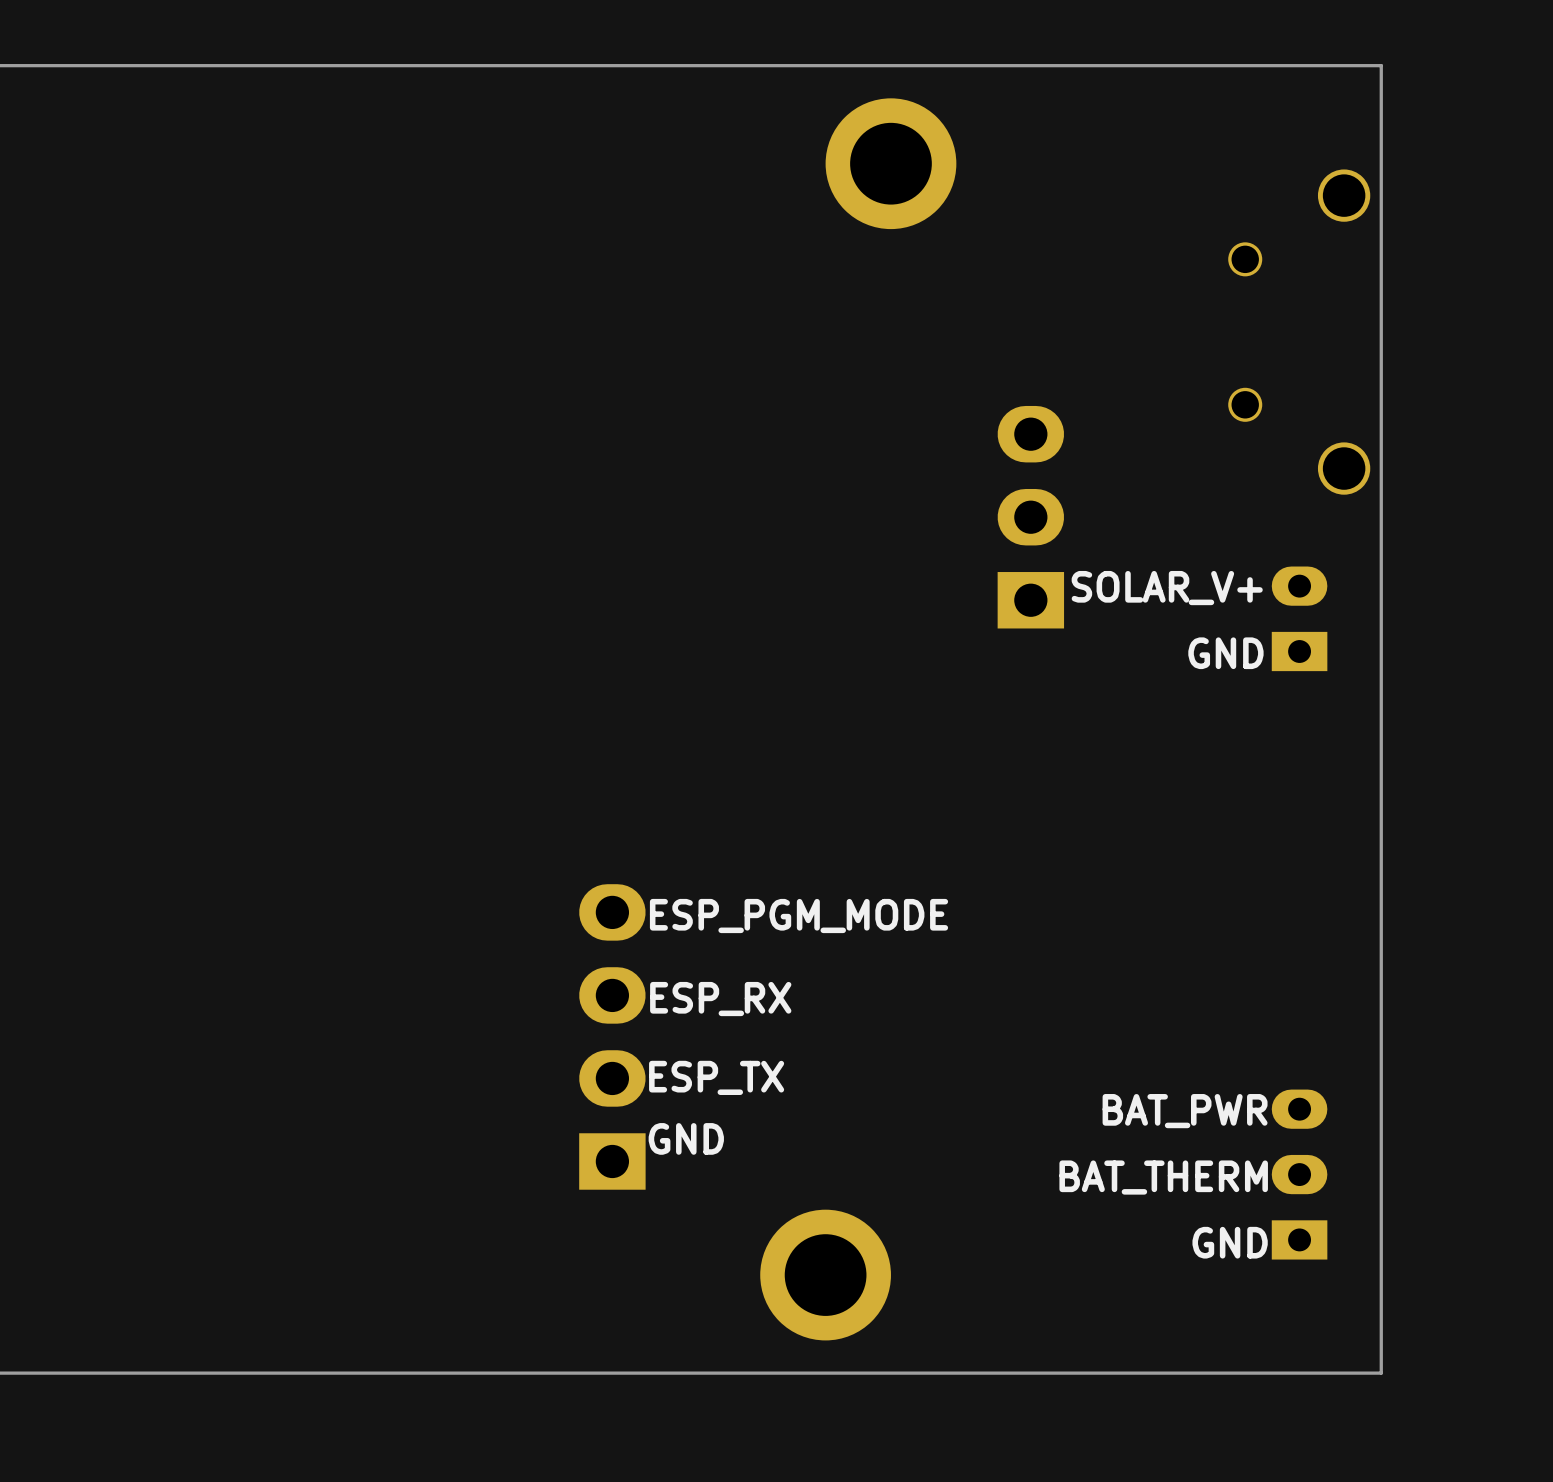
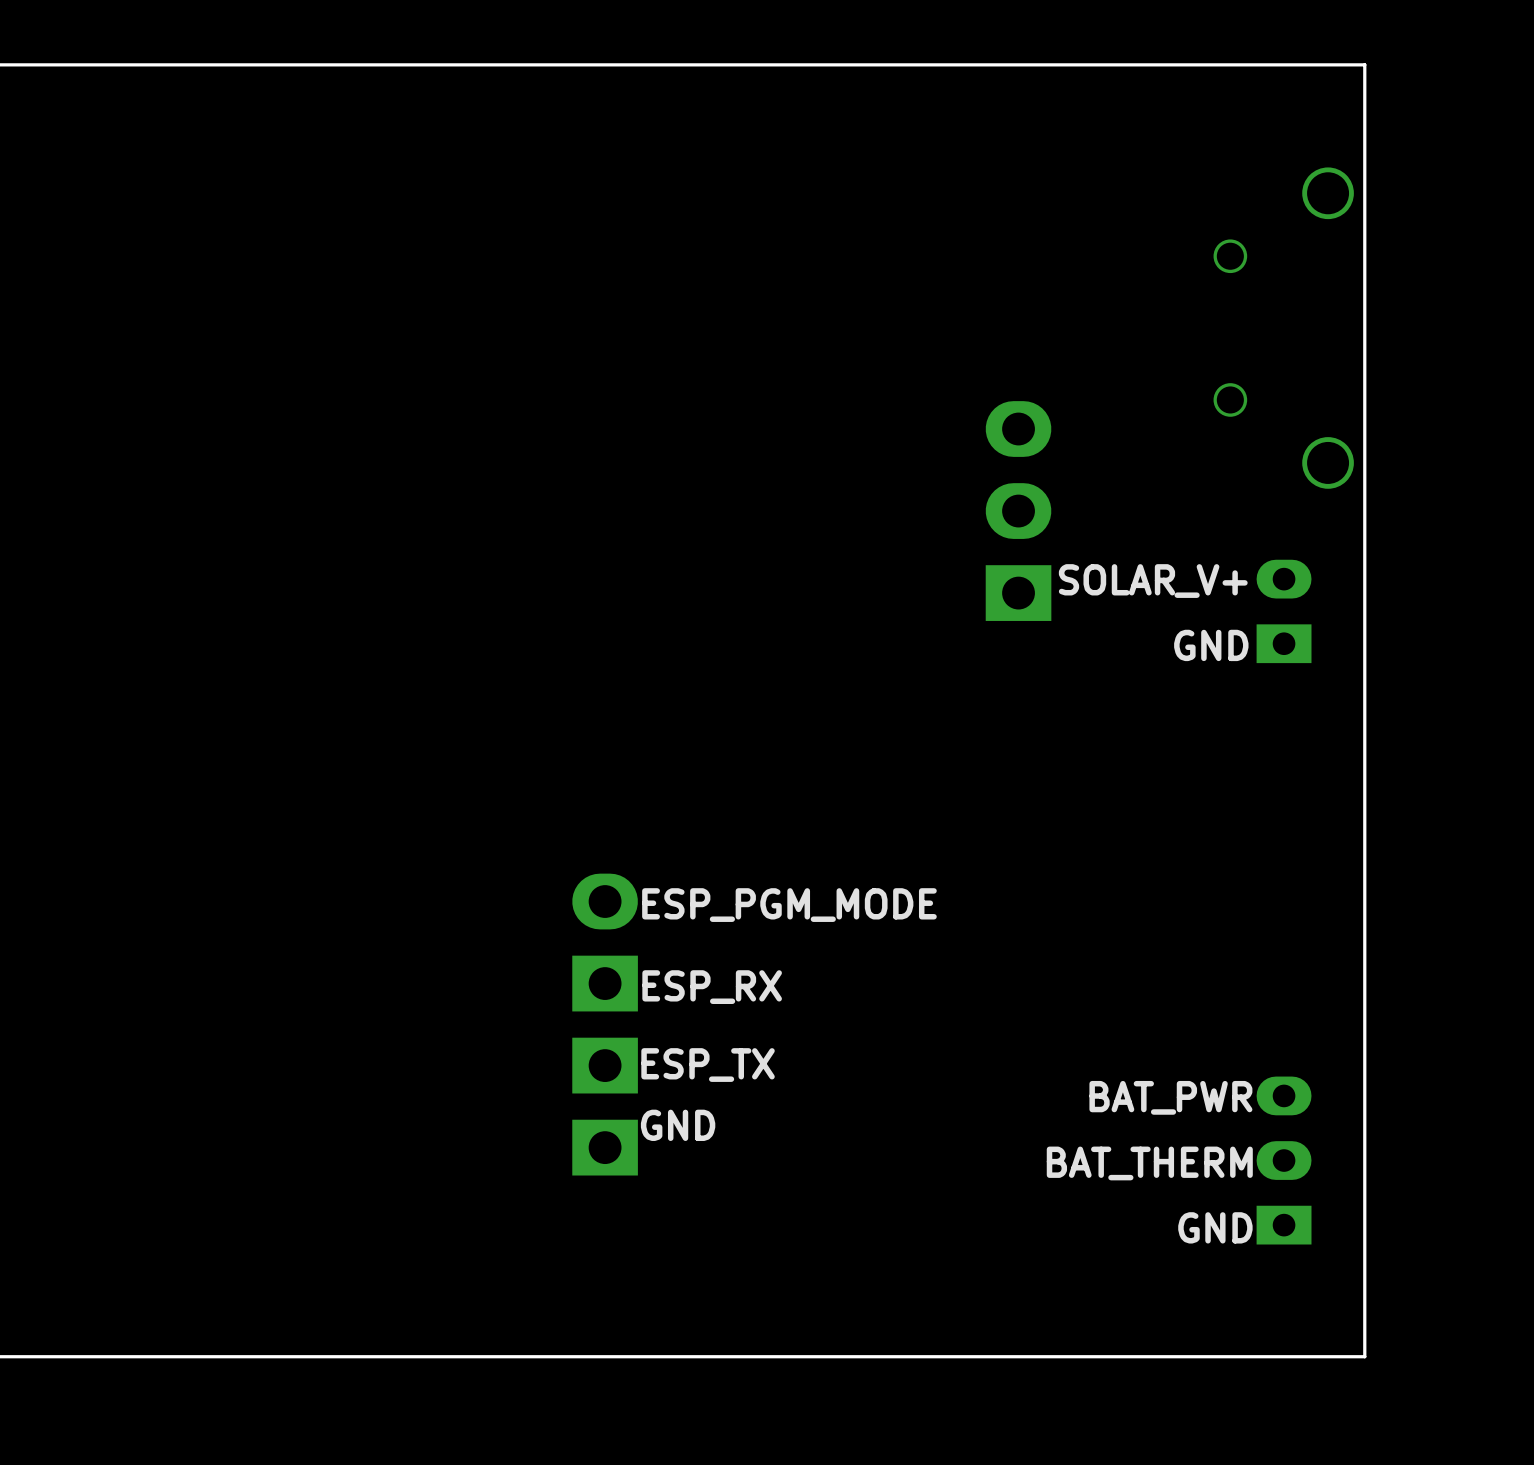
part: (890, 163) -> none
part footprint: [579, 884, 646, 1190] -> [572, 873, 638, 1176]
part: (825, 1275) -> none

